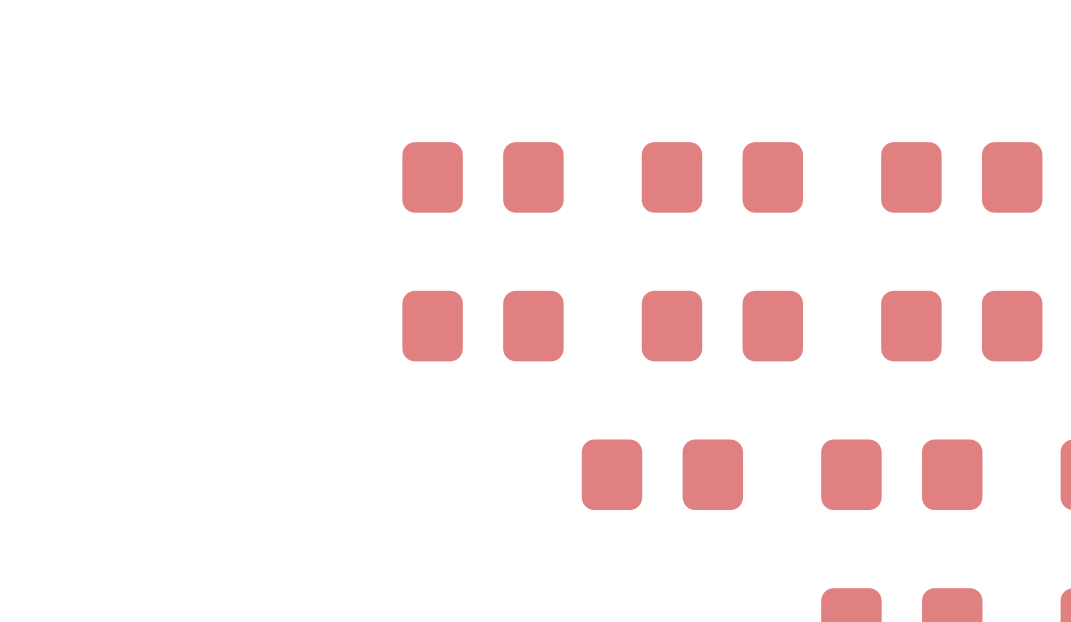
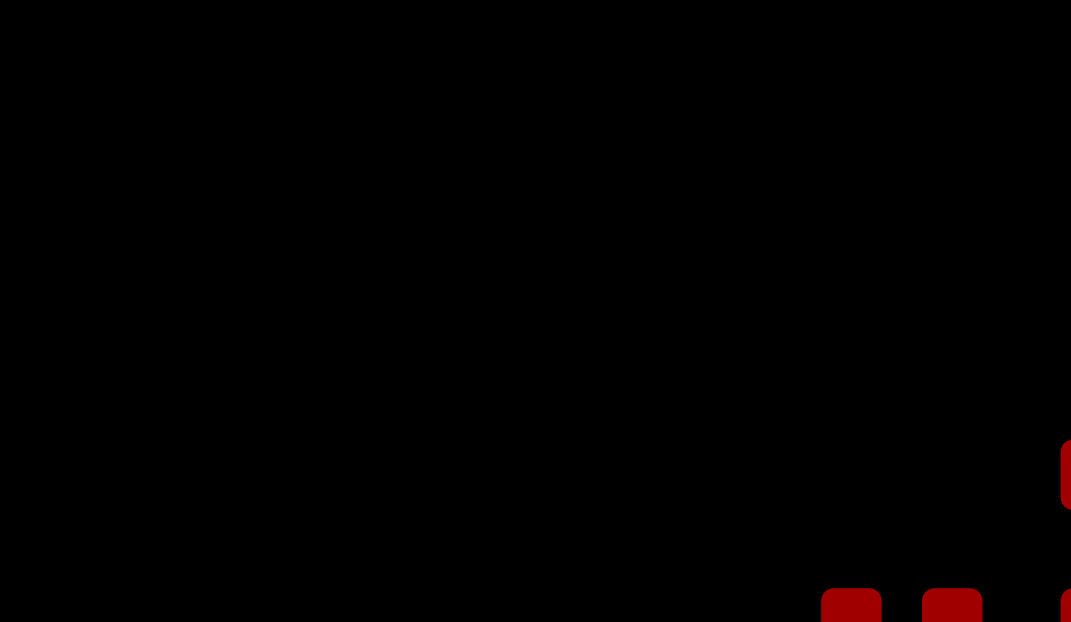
part: (483, 177) -> none
part: (722, 177) -> none
part: (961, 177) -> none
part: (483, 326) -> none
part: (722, 326) -> none
part: (961, 326) -> none
part: (662, 474) -> none
part: (901, 474) -> none

